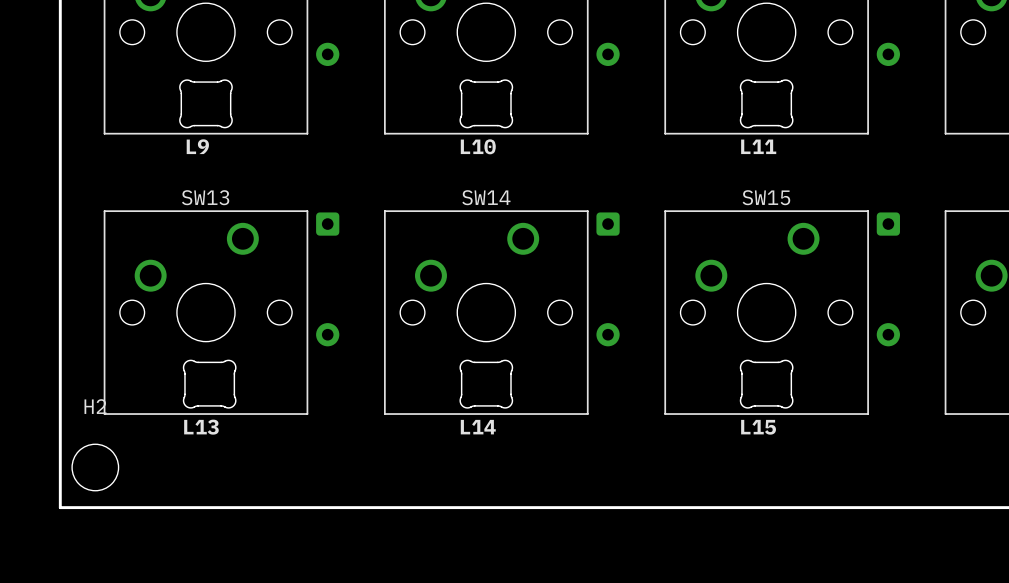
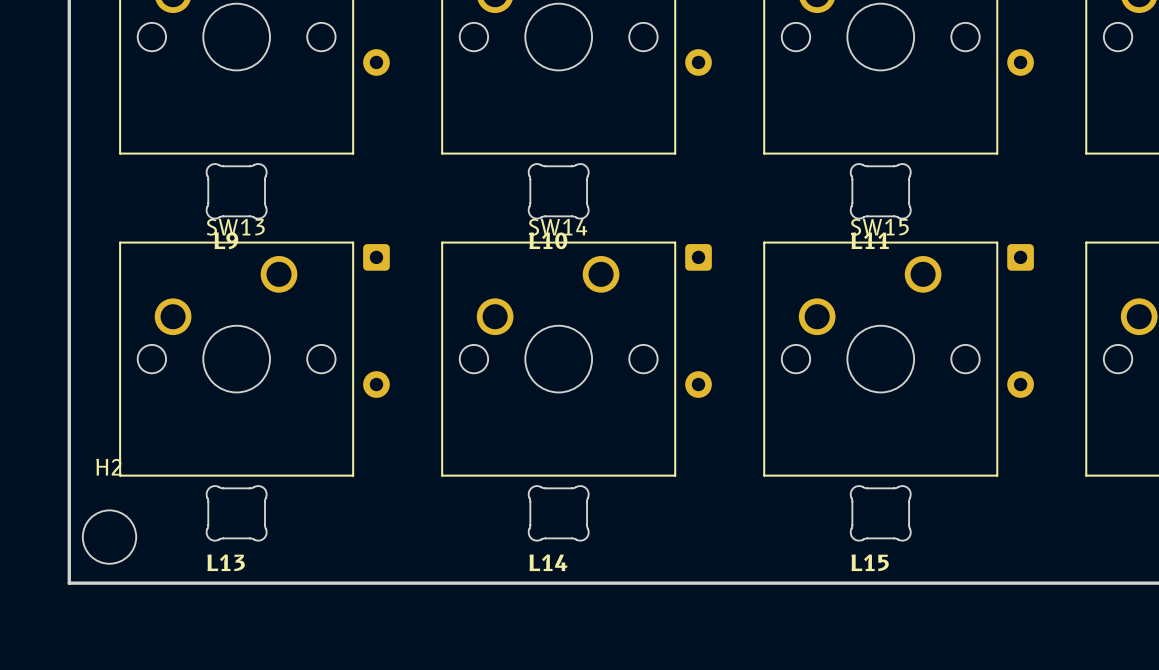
L9 position: (205, 103) -> (236, 191)
L10 position: (486, 103) -> (558, 191)
L11 position: (766, 103) -> (880, 191)
L13 position: (209, 384) -> (236, 513)
L14 position: (486, 384) -> (558, 513)
L15 position: (766, 384) -> (880, 513)

